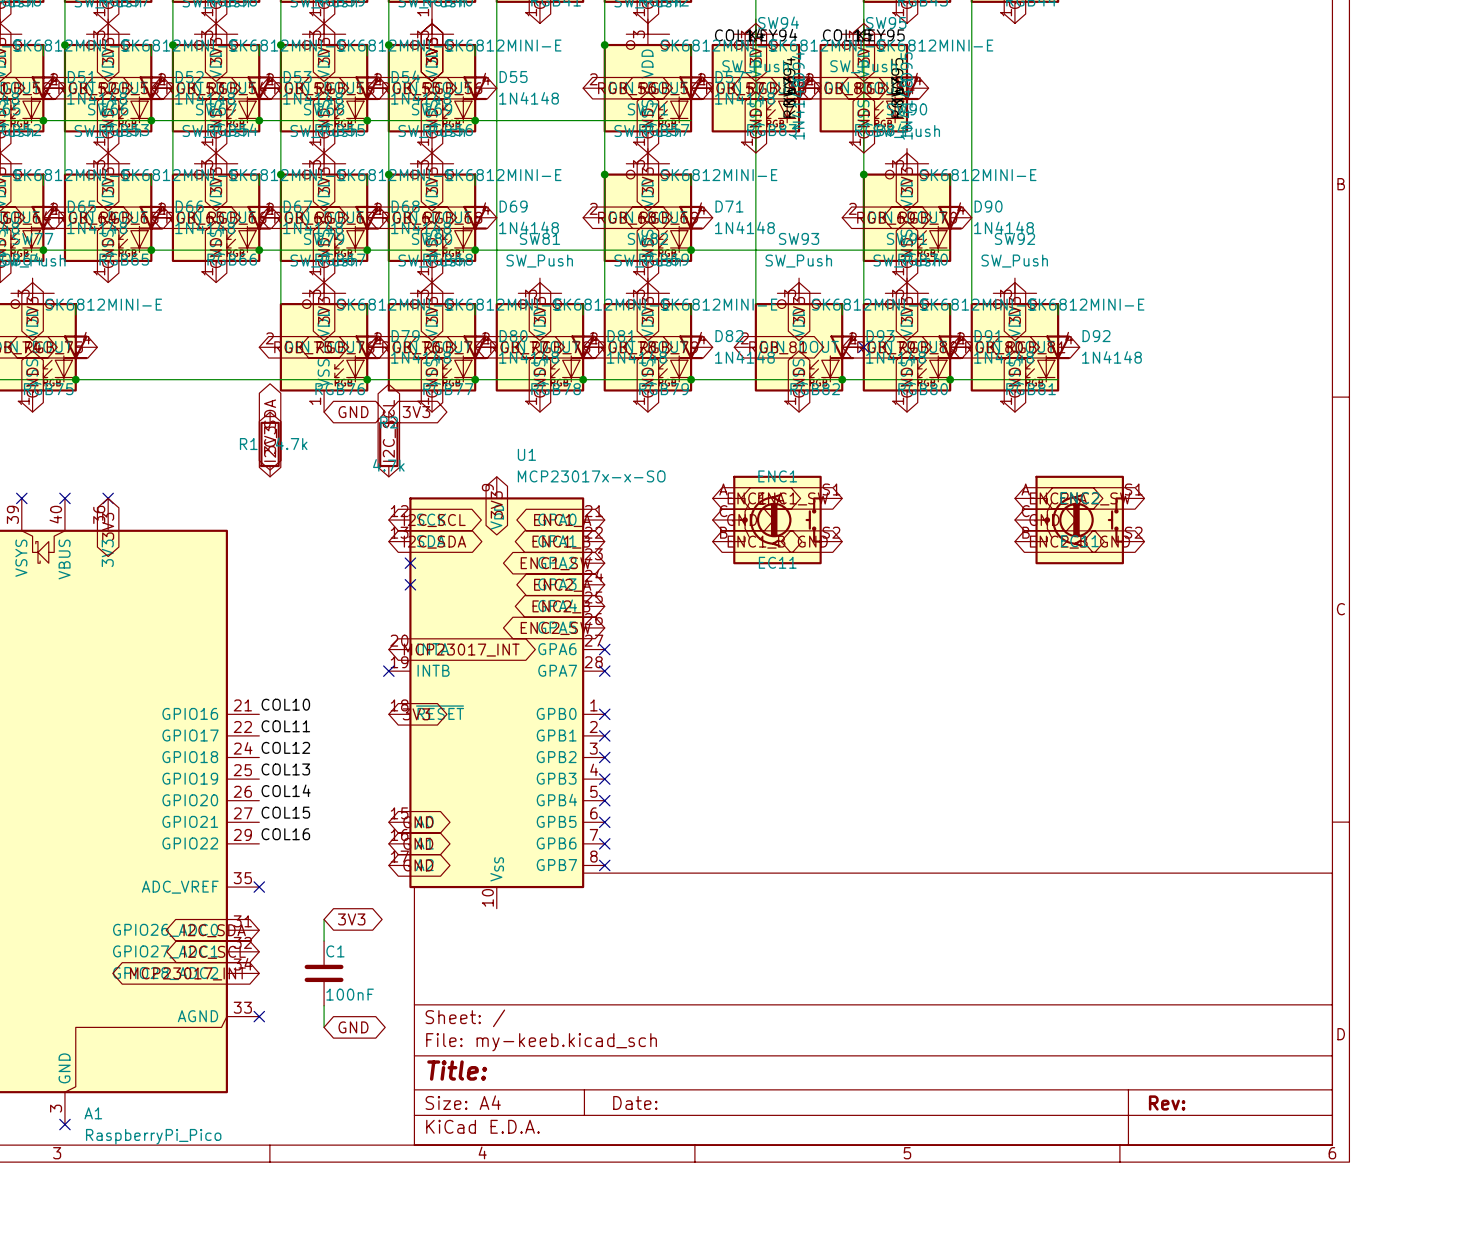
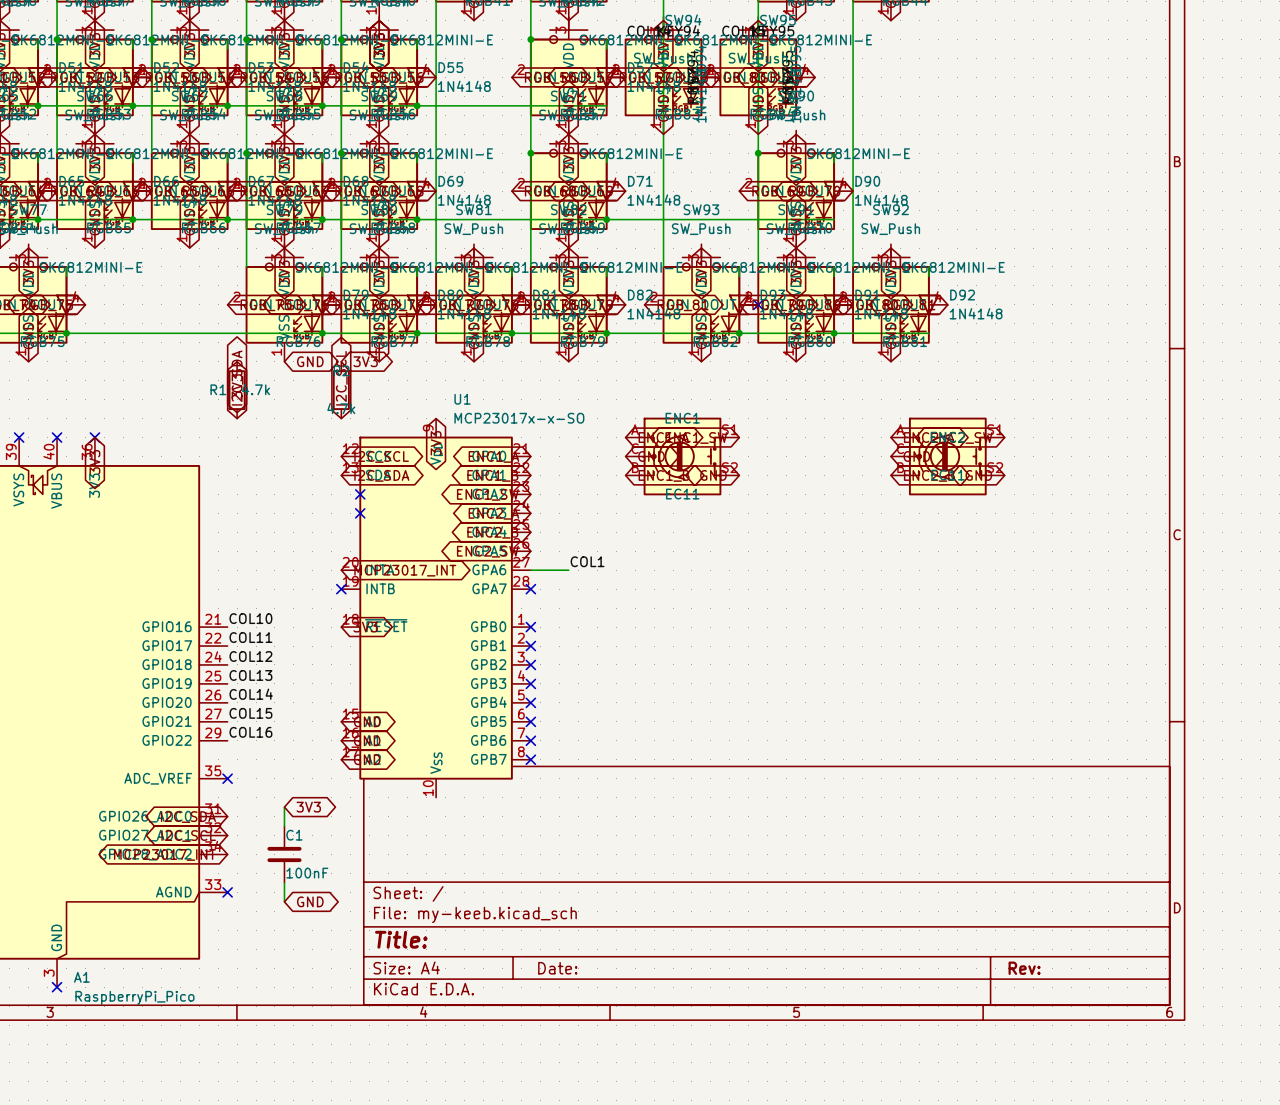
label: none -> COL1 (587, 561)
wire: none -> (530, 570) (568, 570)
no-connect mark: (604, 649) -> none

